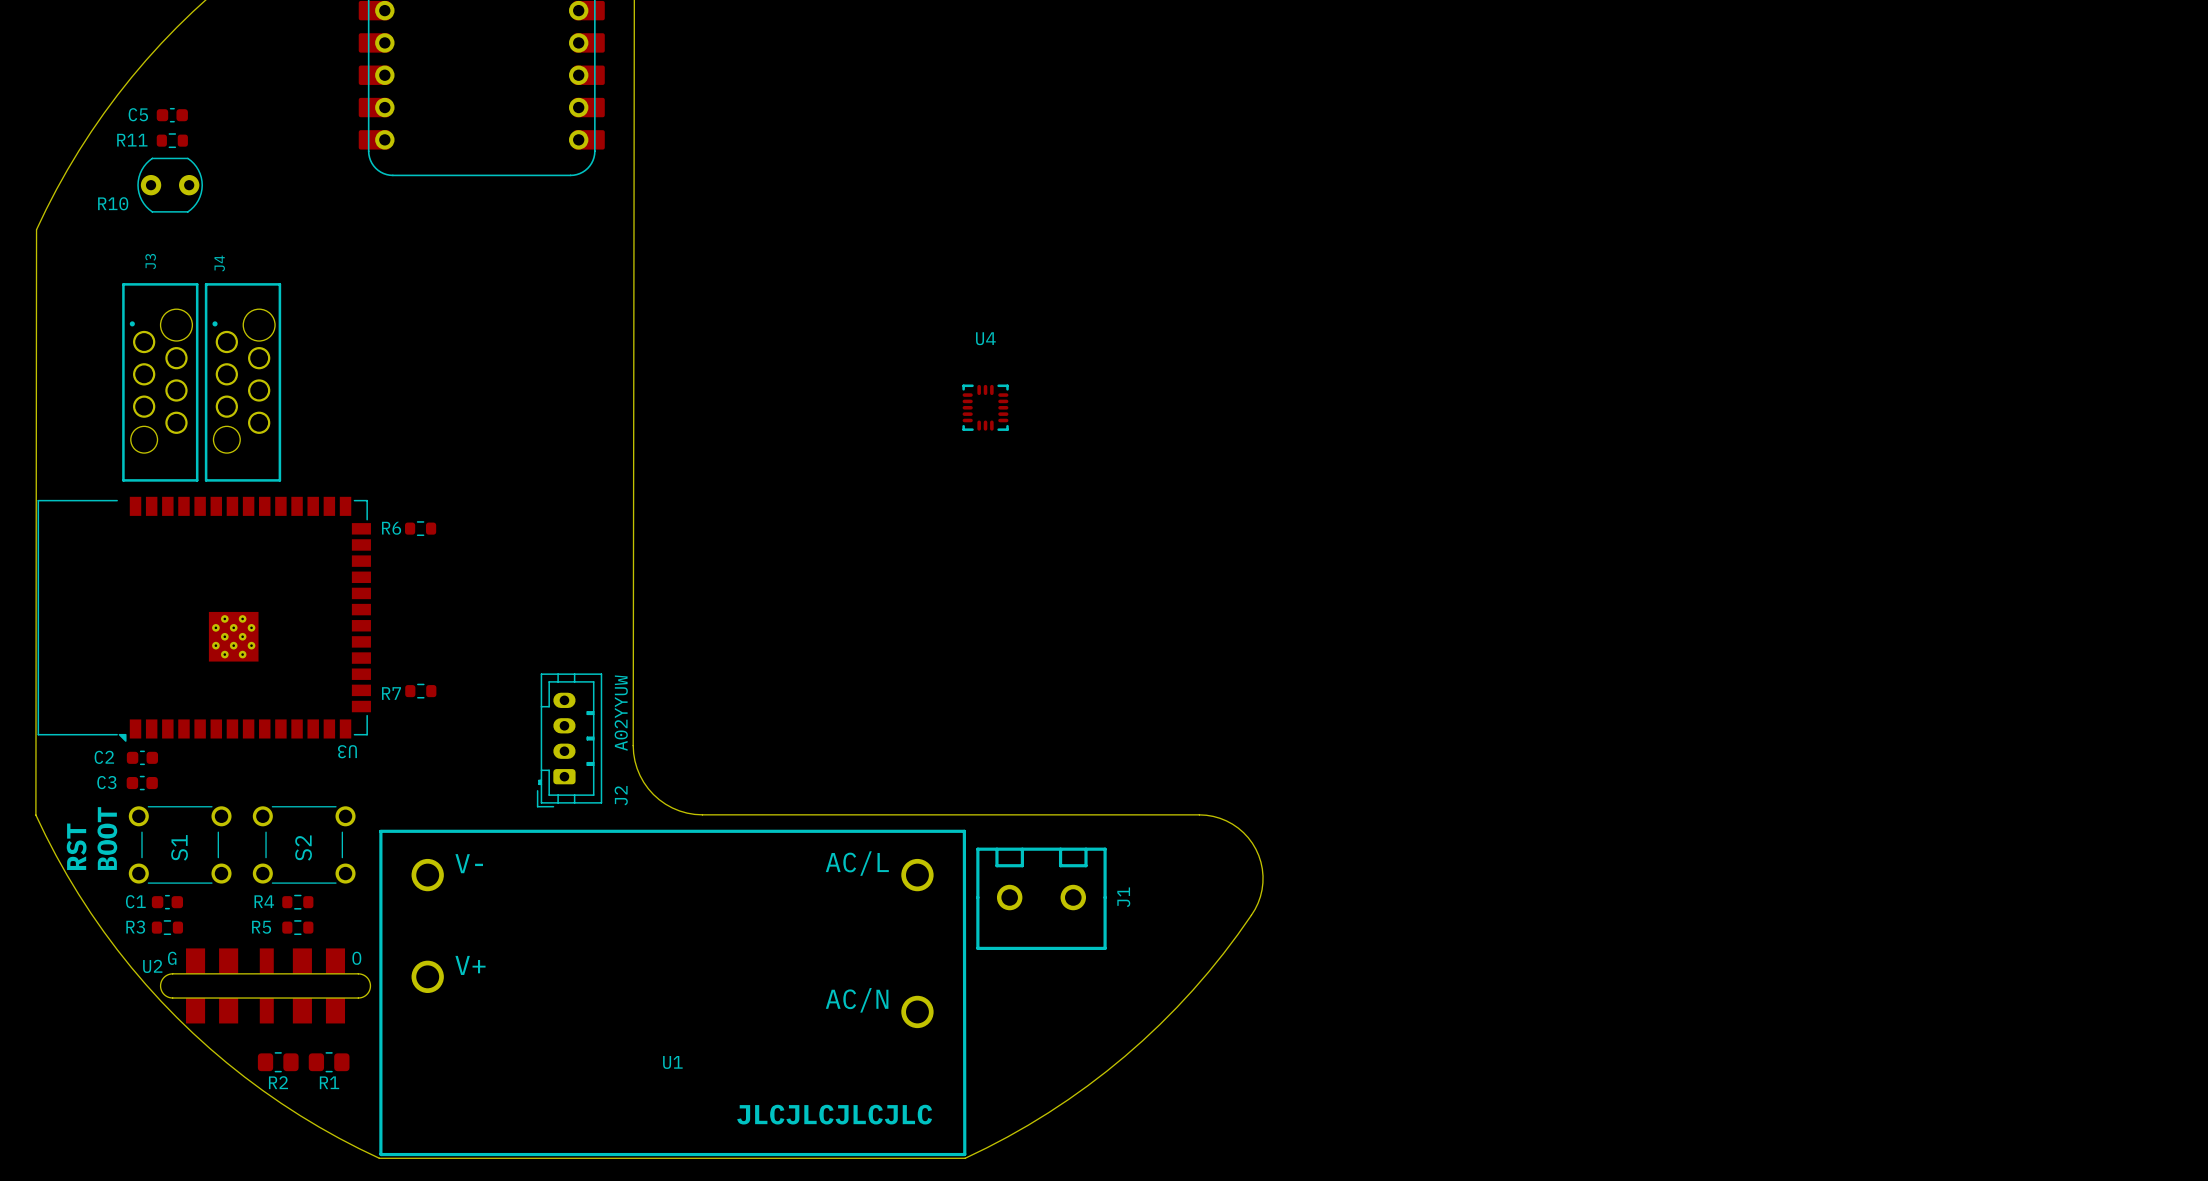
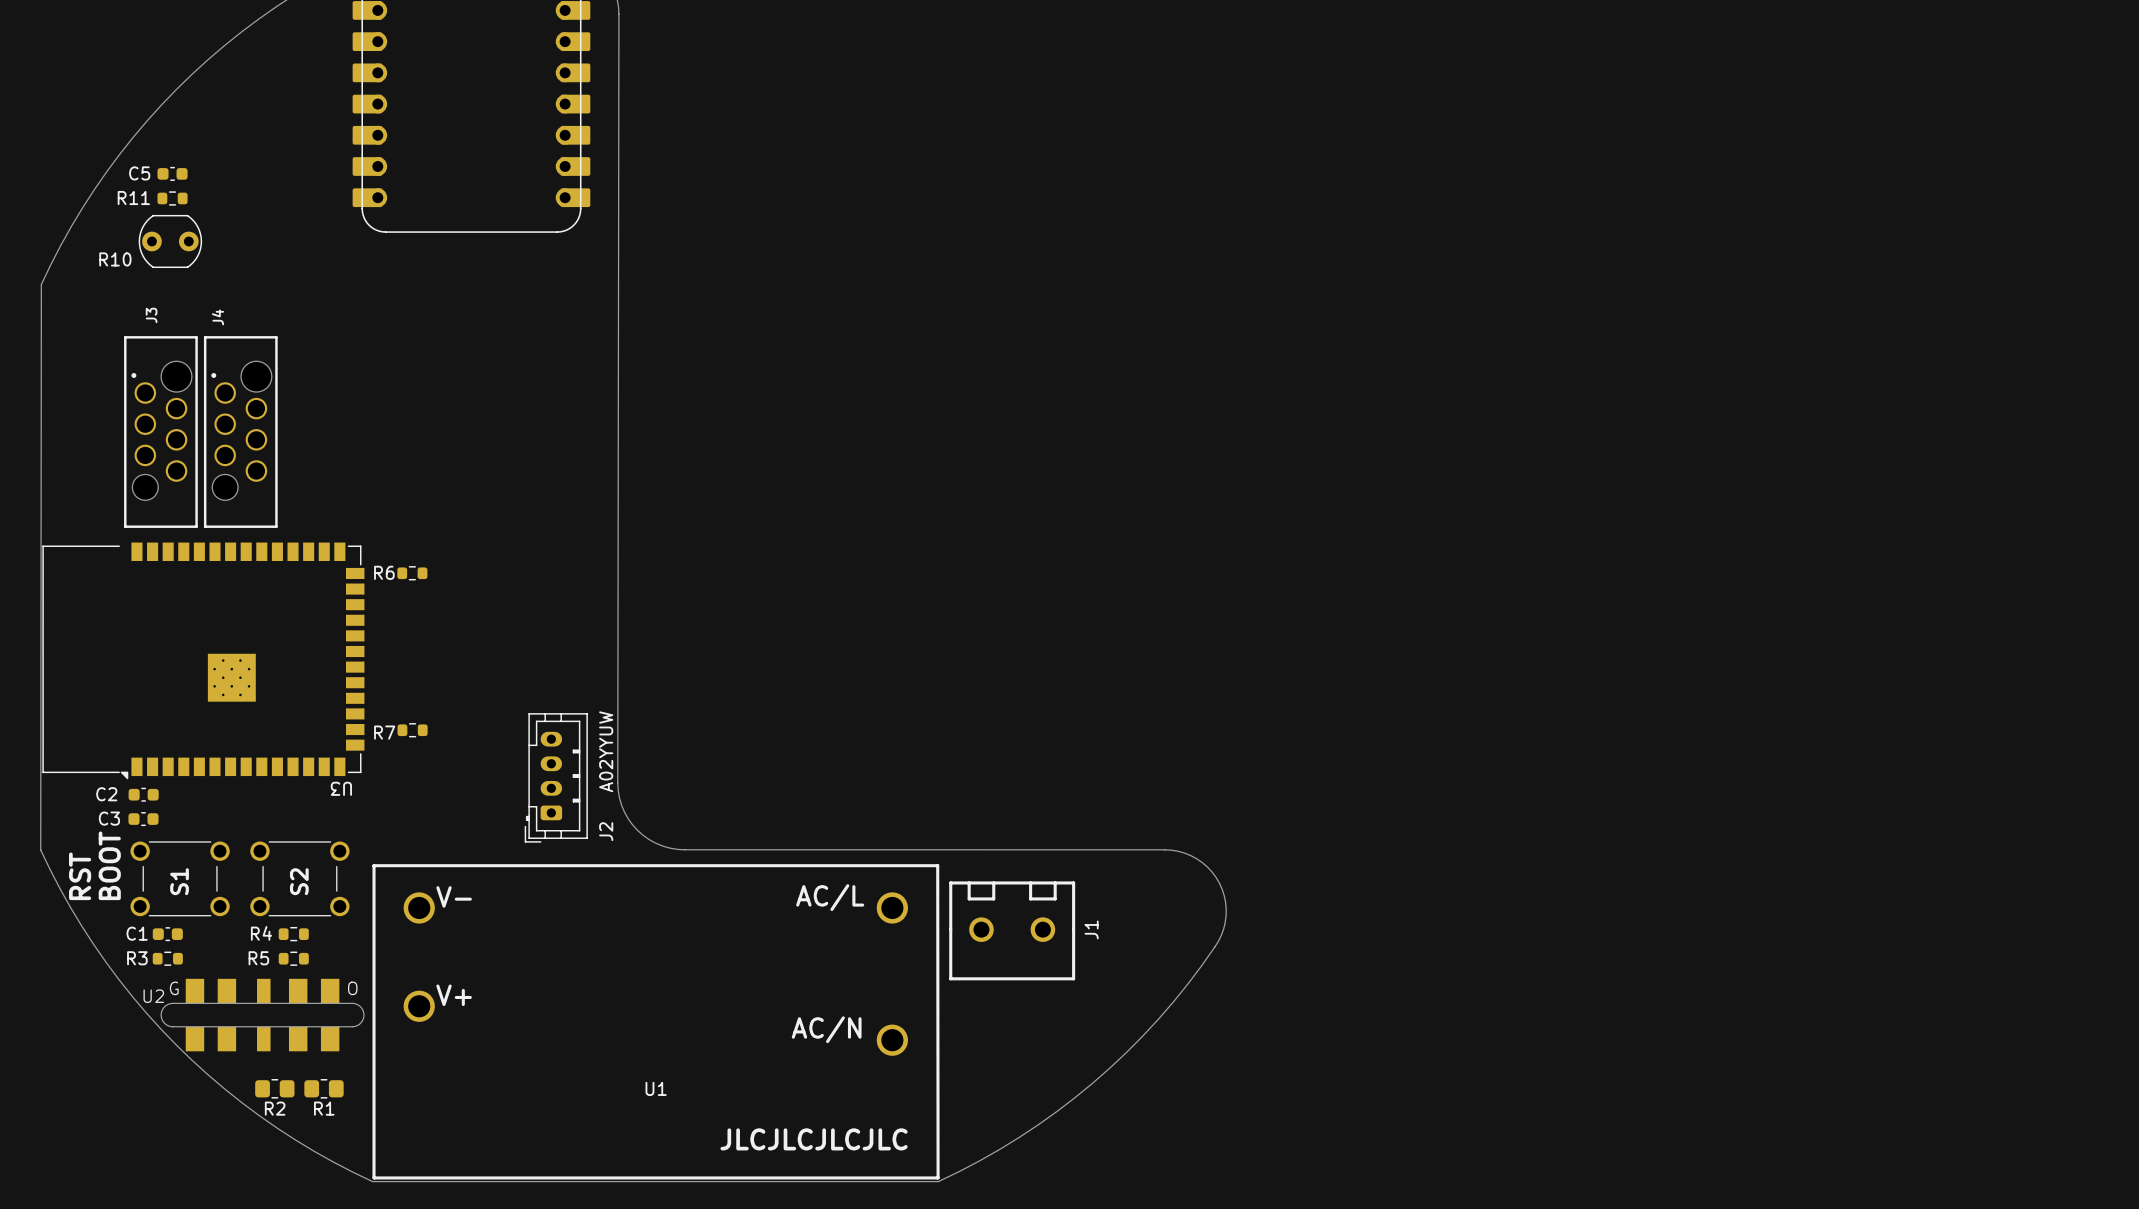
U4: (985, 407) -> none

